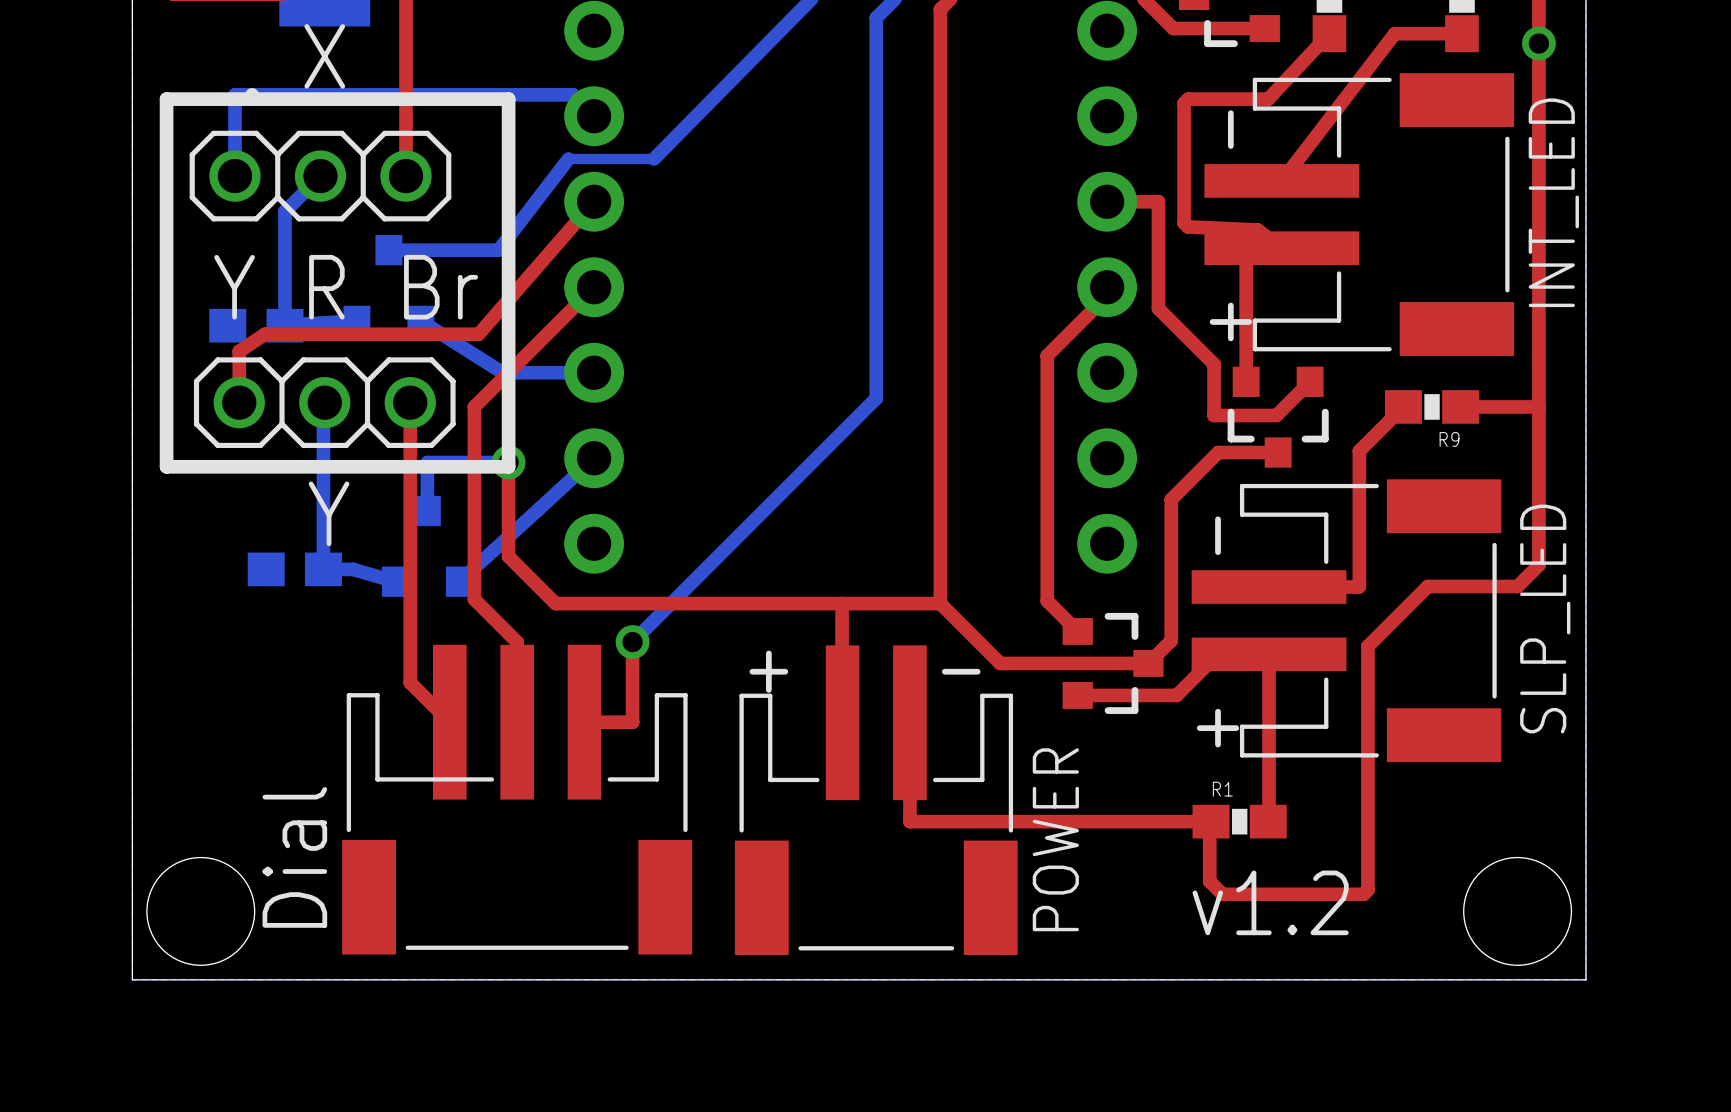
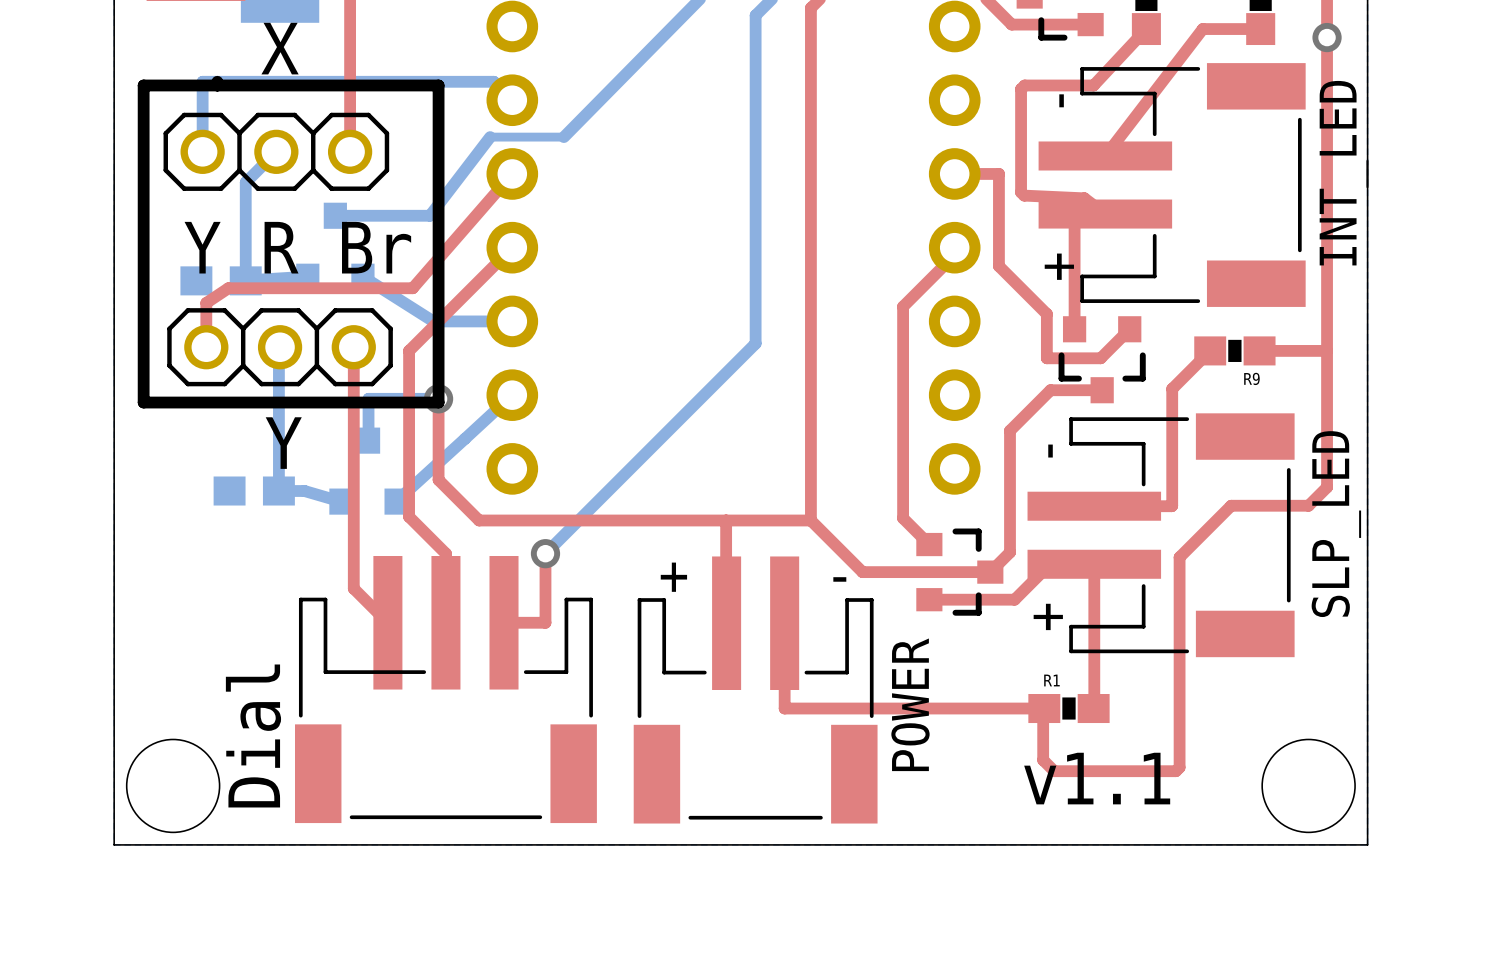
text: v1.2 (1270, 902) -> v1.1 (1097, 778)

